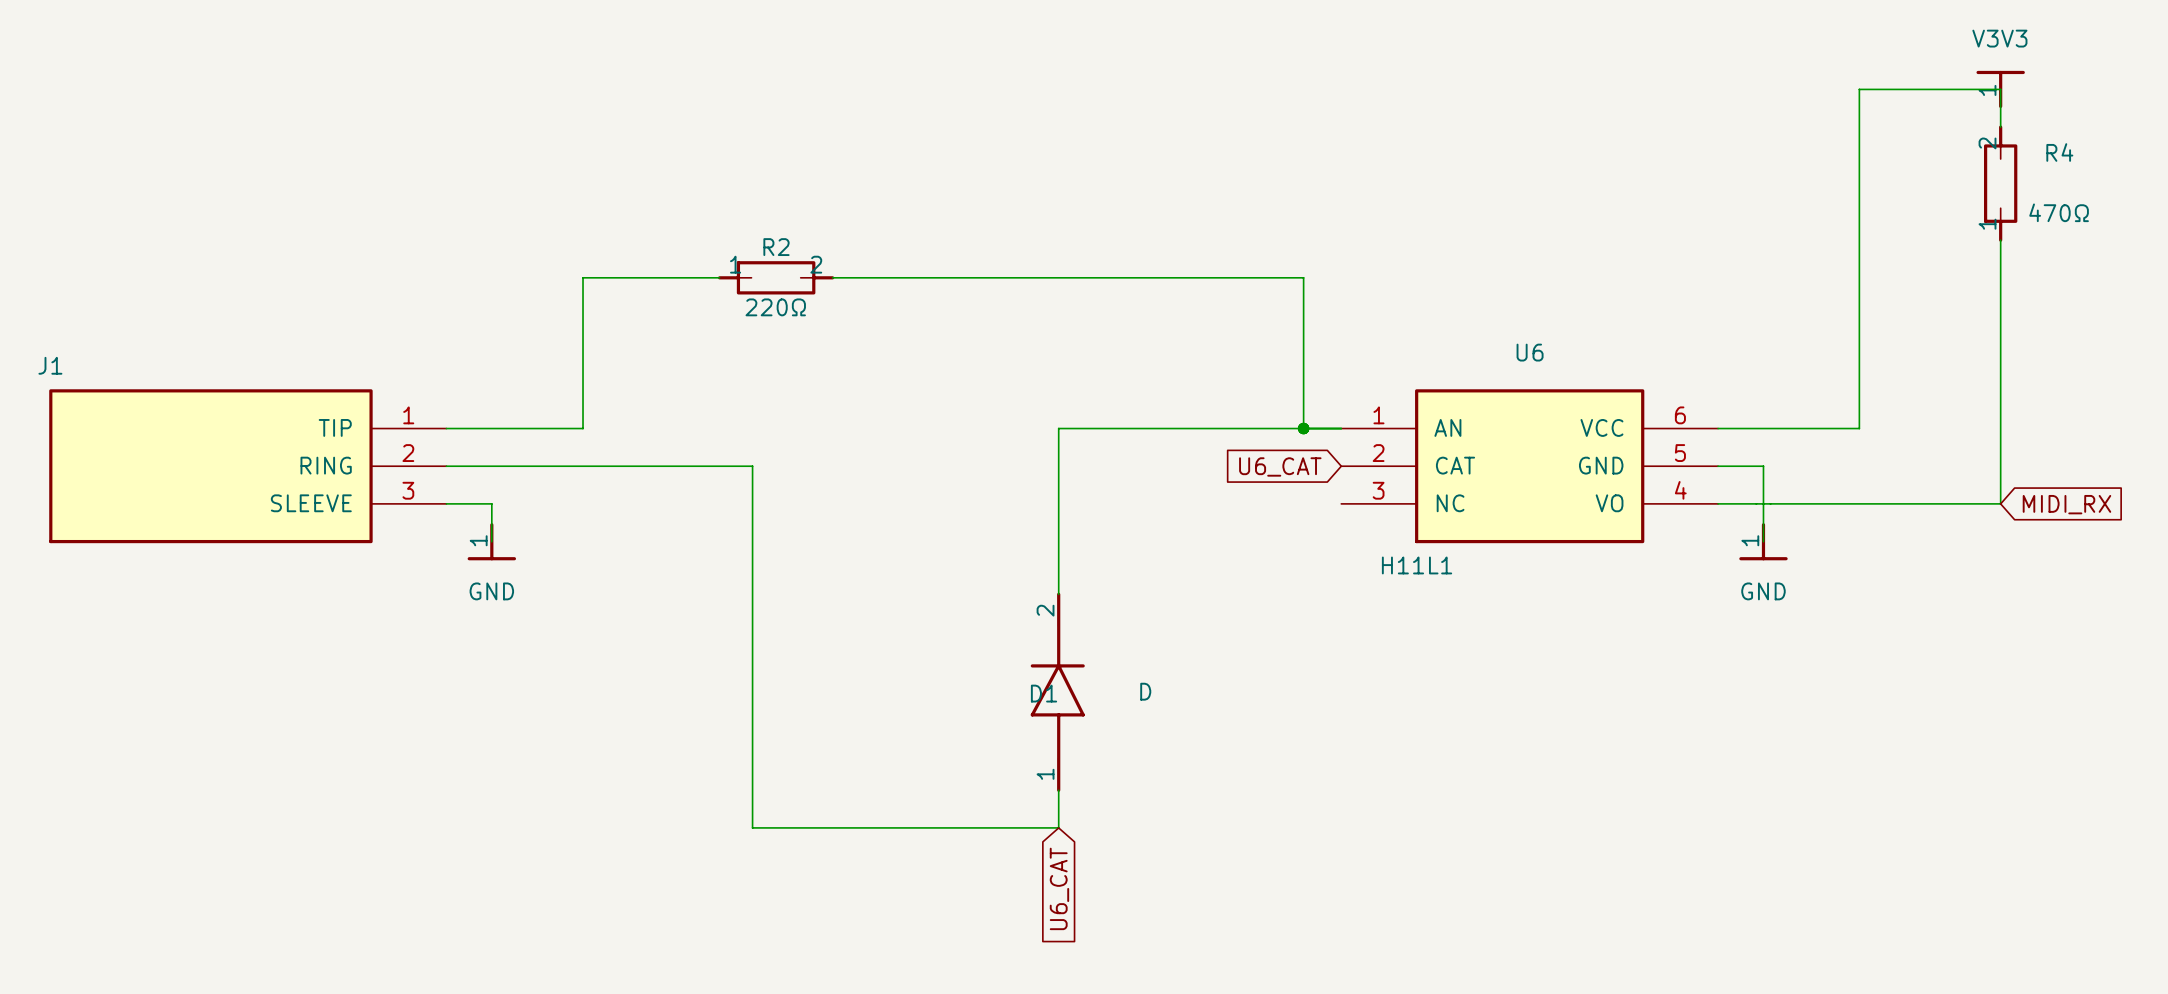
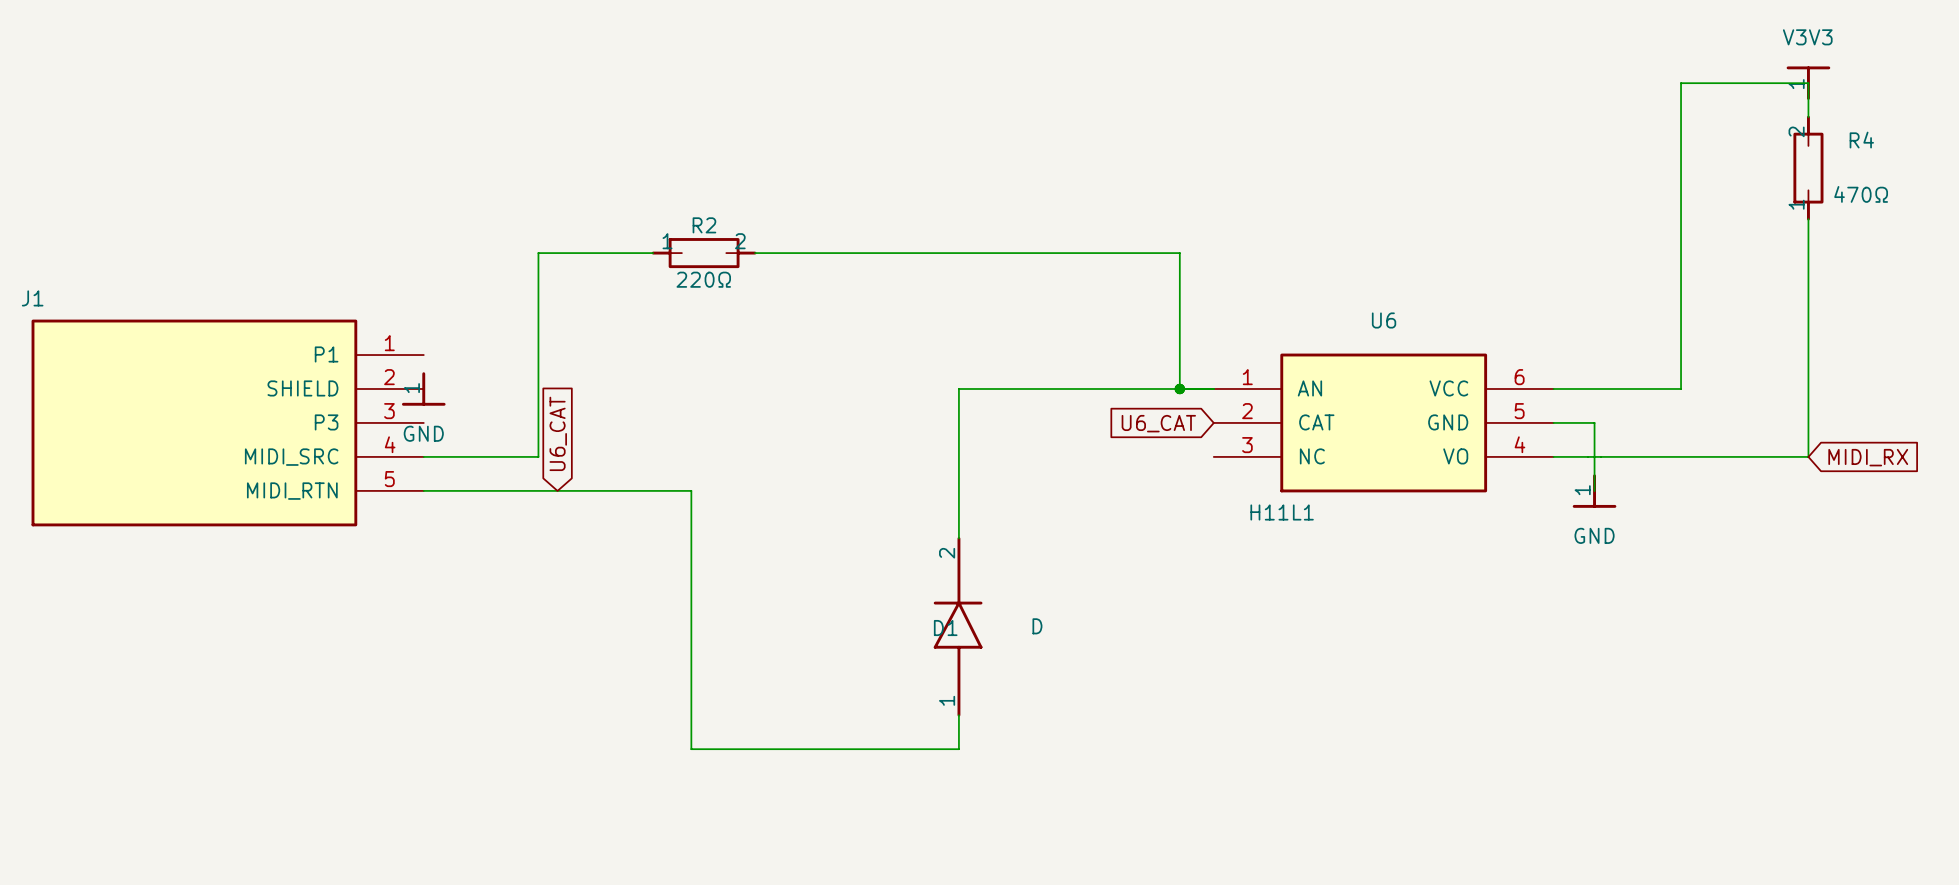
wire: (592, 277) (583, 277) (583, 428) (446, 428) -> (538, 253) (538, 456) (447, 456)
J1 name position: J1 (50, 365) -> J1 (32, 298)
J1 symbol: [49, 389, 447, 544] -> [31, 319, 424, 527]
wire: (446, 466) (752, 466) (752, 827) (761, 827) -> (423, 490) (691, 490) (691, 749)
global label: none -> U6_CAT (558, 433)
wire: (491, 503) (491, 541) -> none
GND position: (491, 541) -> (423, 388)
global label: U6_CAT (1059, 888) -> none

